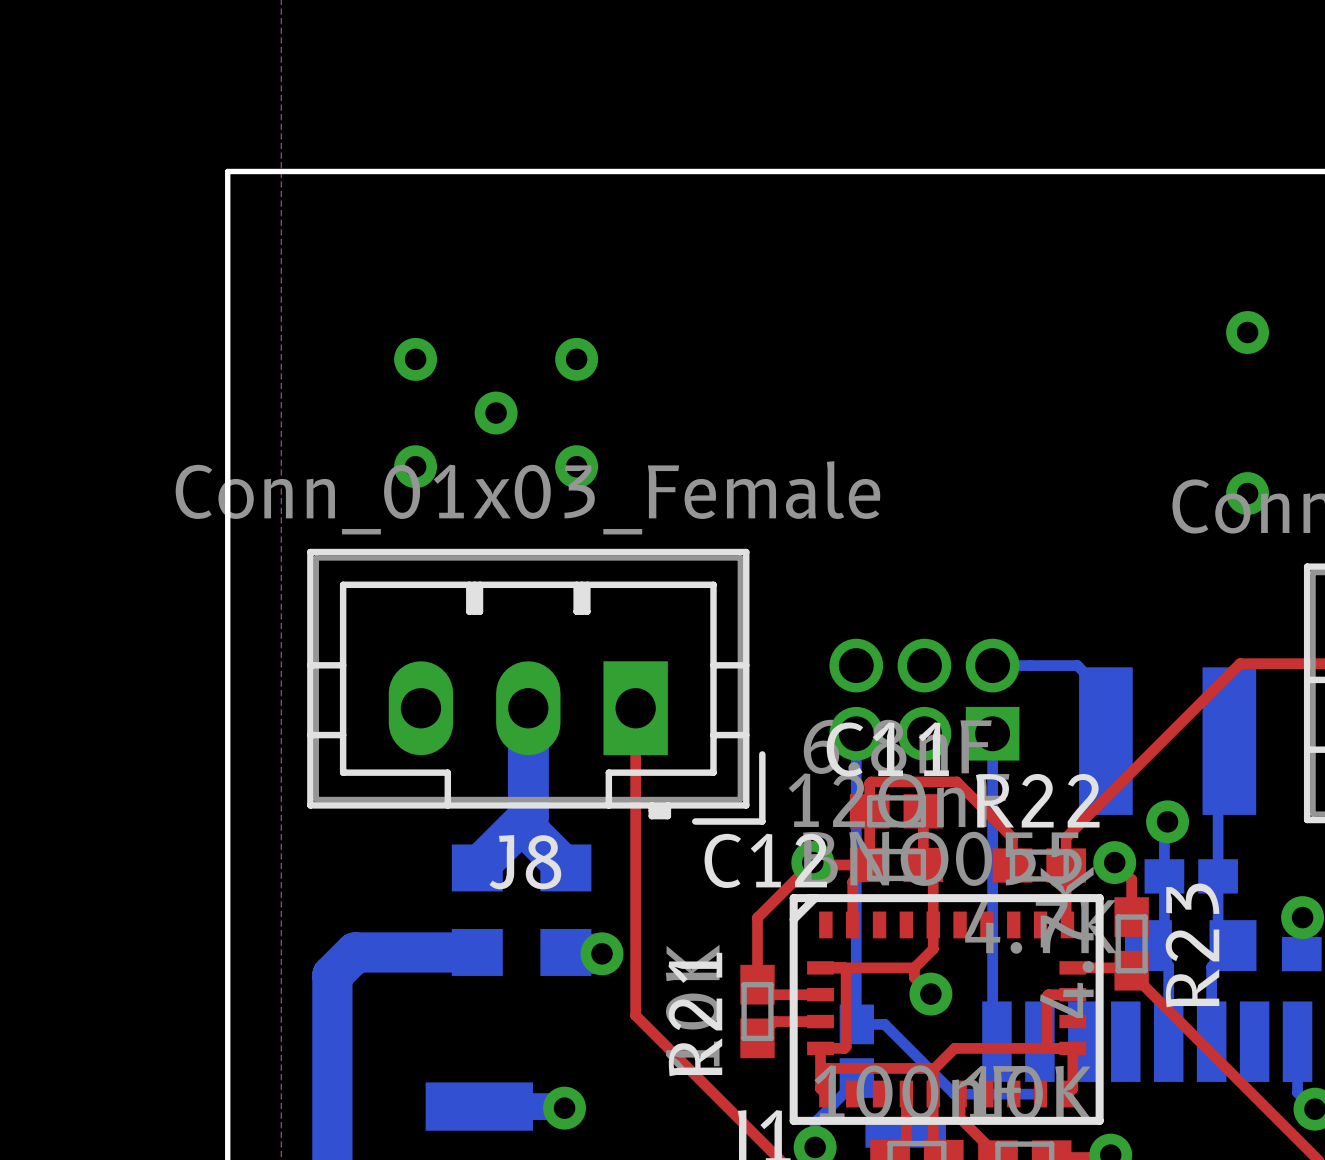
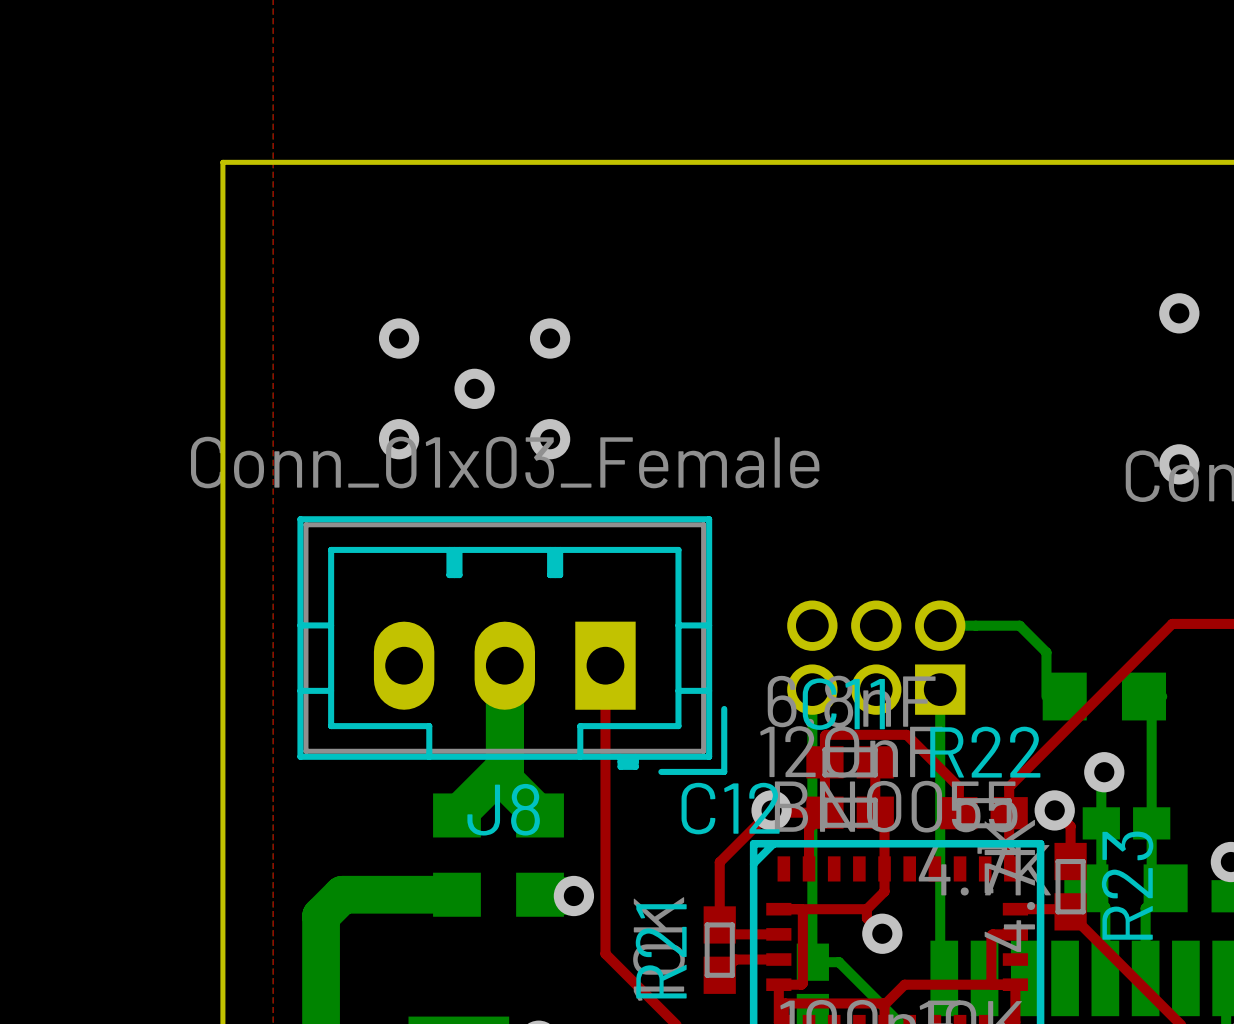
part footprint: [1079, 667, 1257, 815] -> [1042, 672, 1167, 721]

